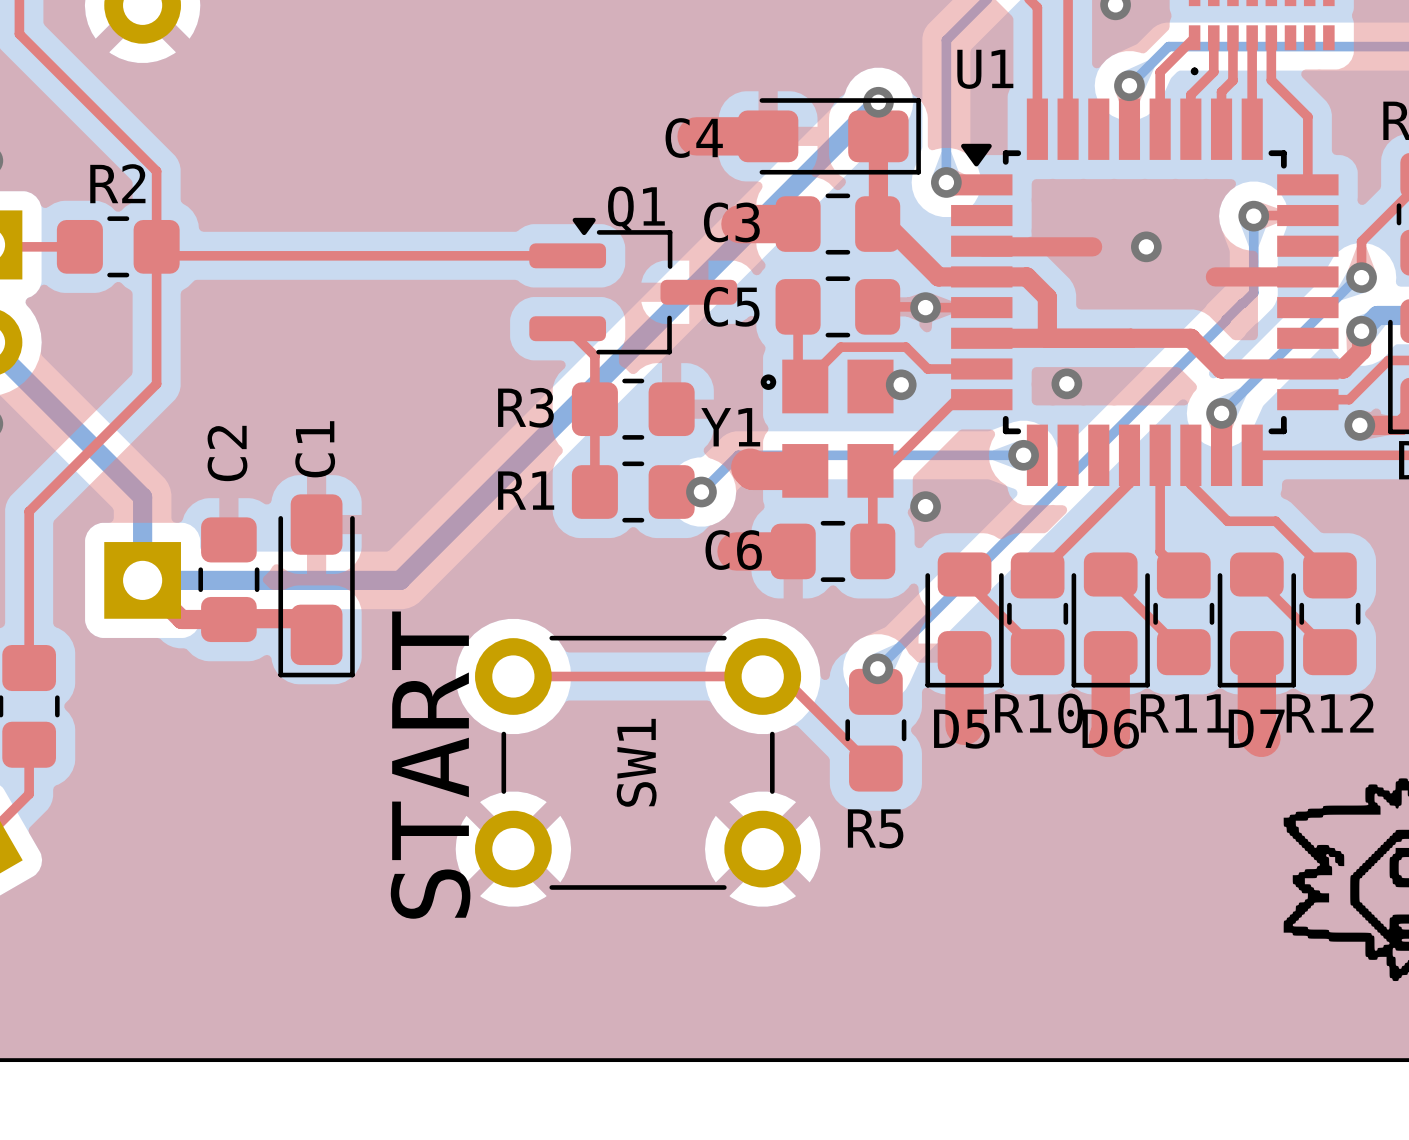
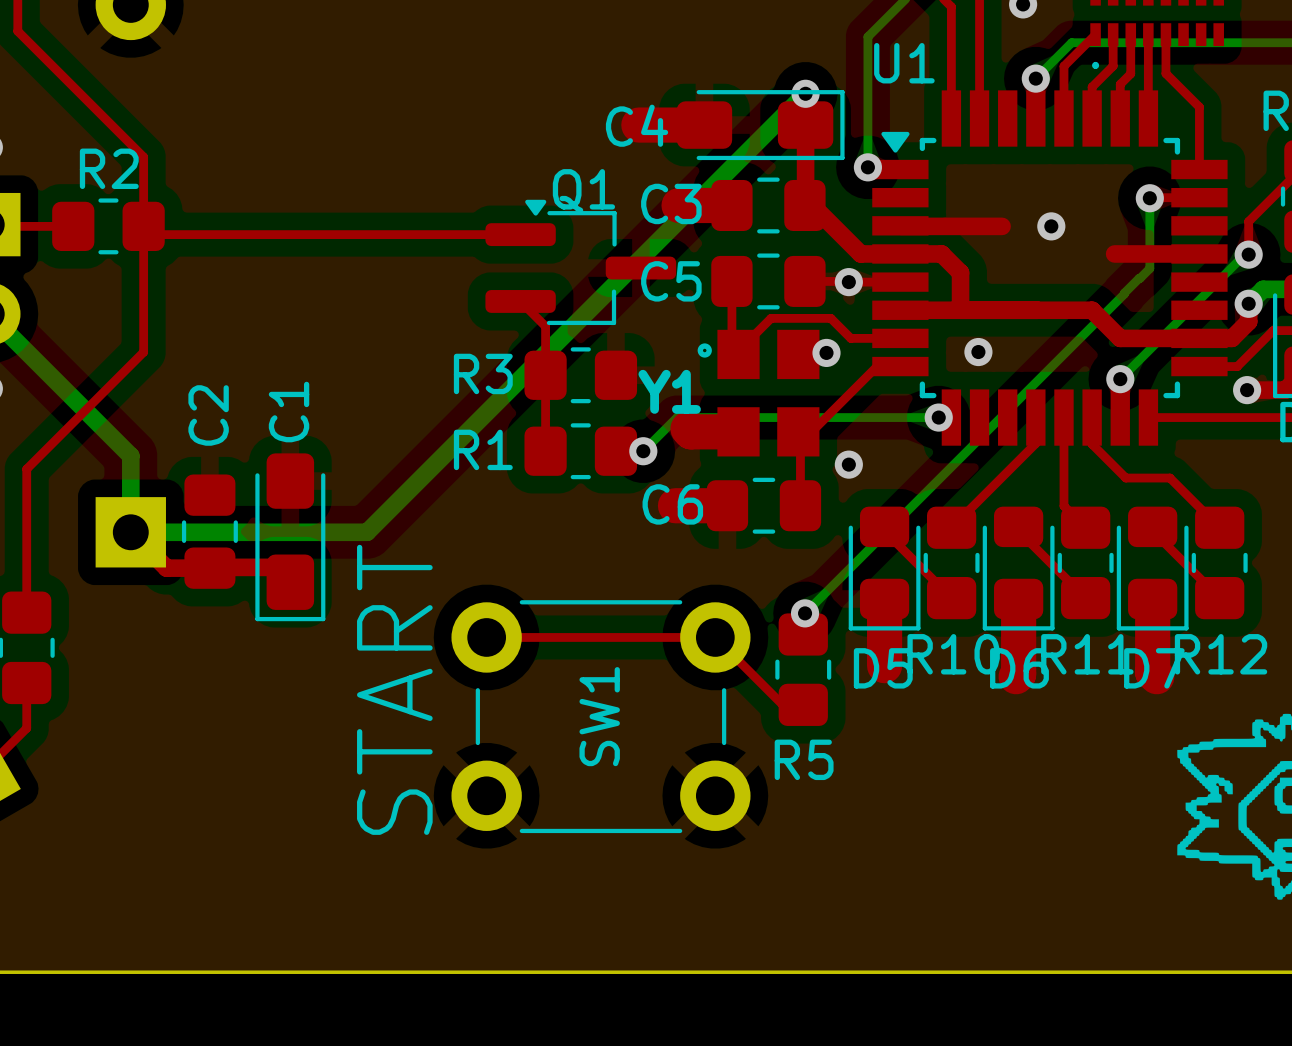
top track: (513, 676) (781, 676) (873, 768) -> (486, 637) (715, 637) (782, 704) (801, 704)
SW1 position: (638, 762) -> (601, 716)

